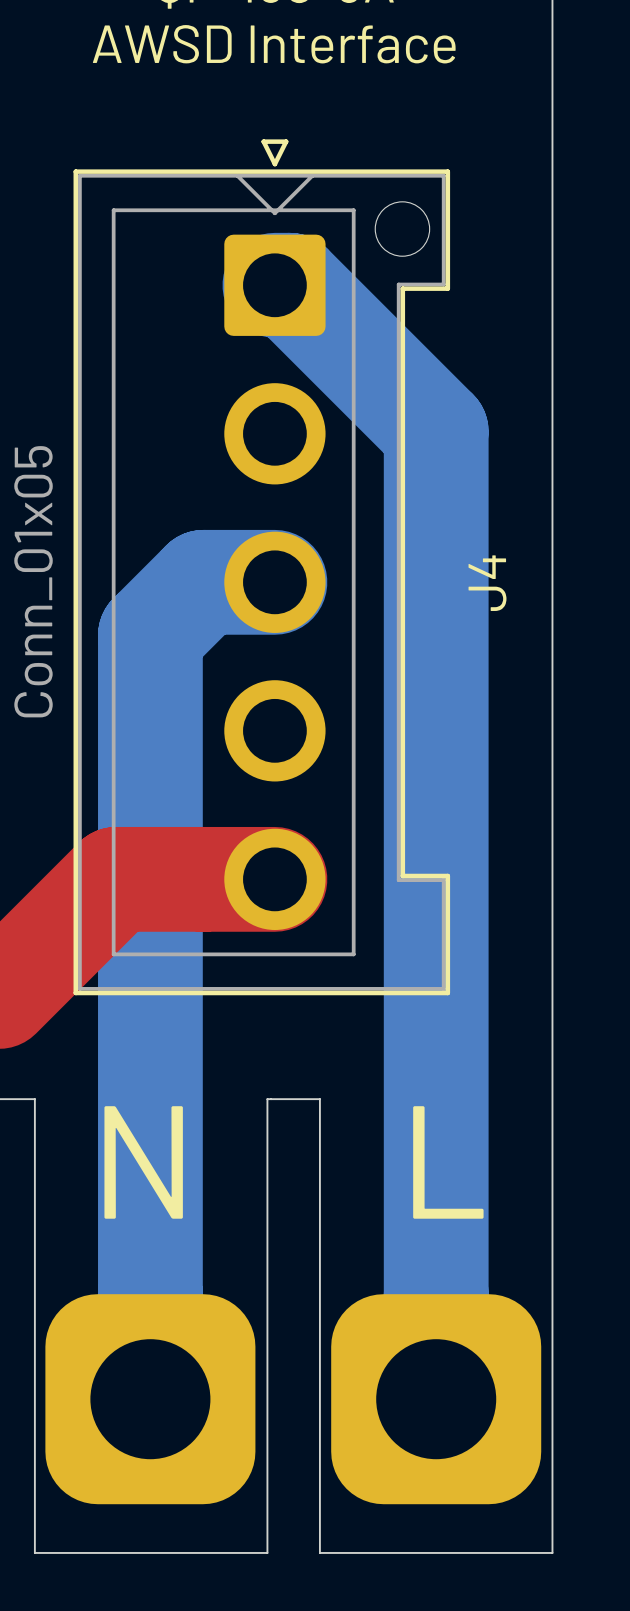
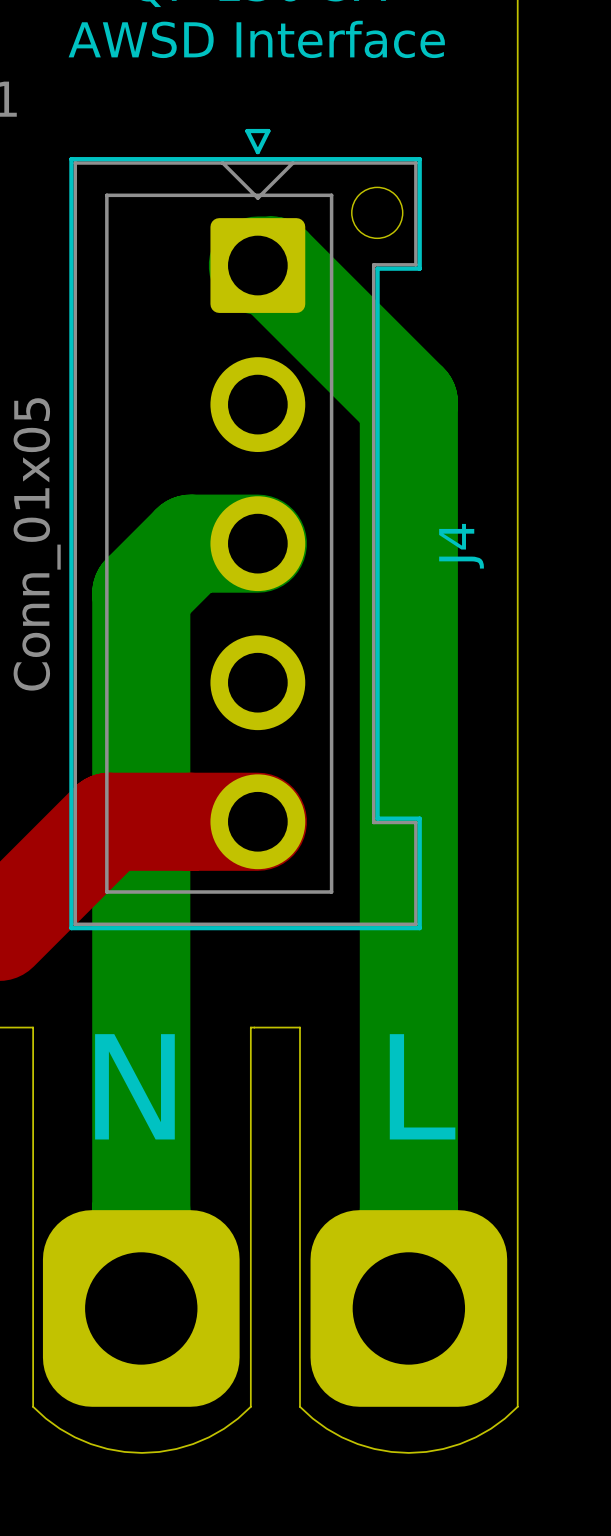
board edge: (34, 1504) (34, 1552) (267, 1552) (267, 1504) -> (33, 1406) (59, 1428) (90, 1444) (107, 1448) (141, 1452) (176, 1448) (208, 1437) (238, 1418) (250, 1406)
board edge: (319, 1504) (319, 1552) (552, 1552) (552, 1504) -> (299, 1406) (312, 1418) (341, 1437) (374, 1448) (408, 1452) (426, 1451) (459, 1444) (490, 1428) (517, 1406)

